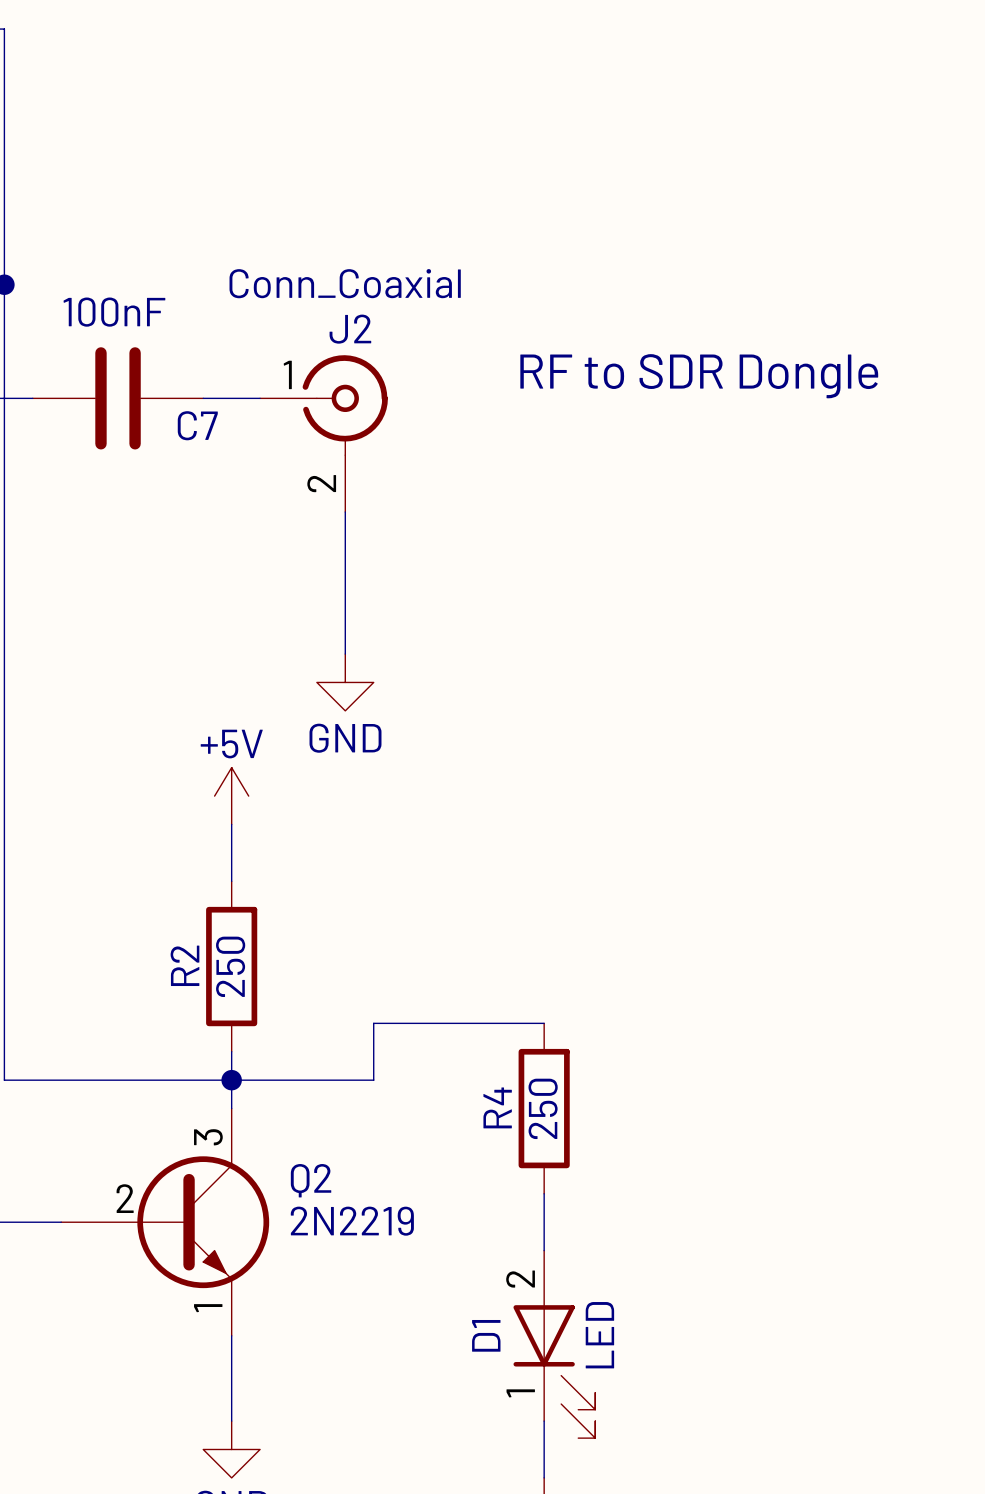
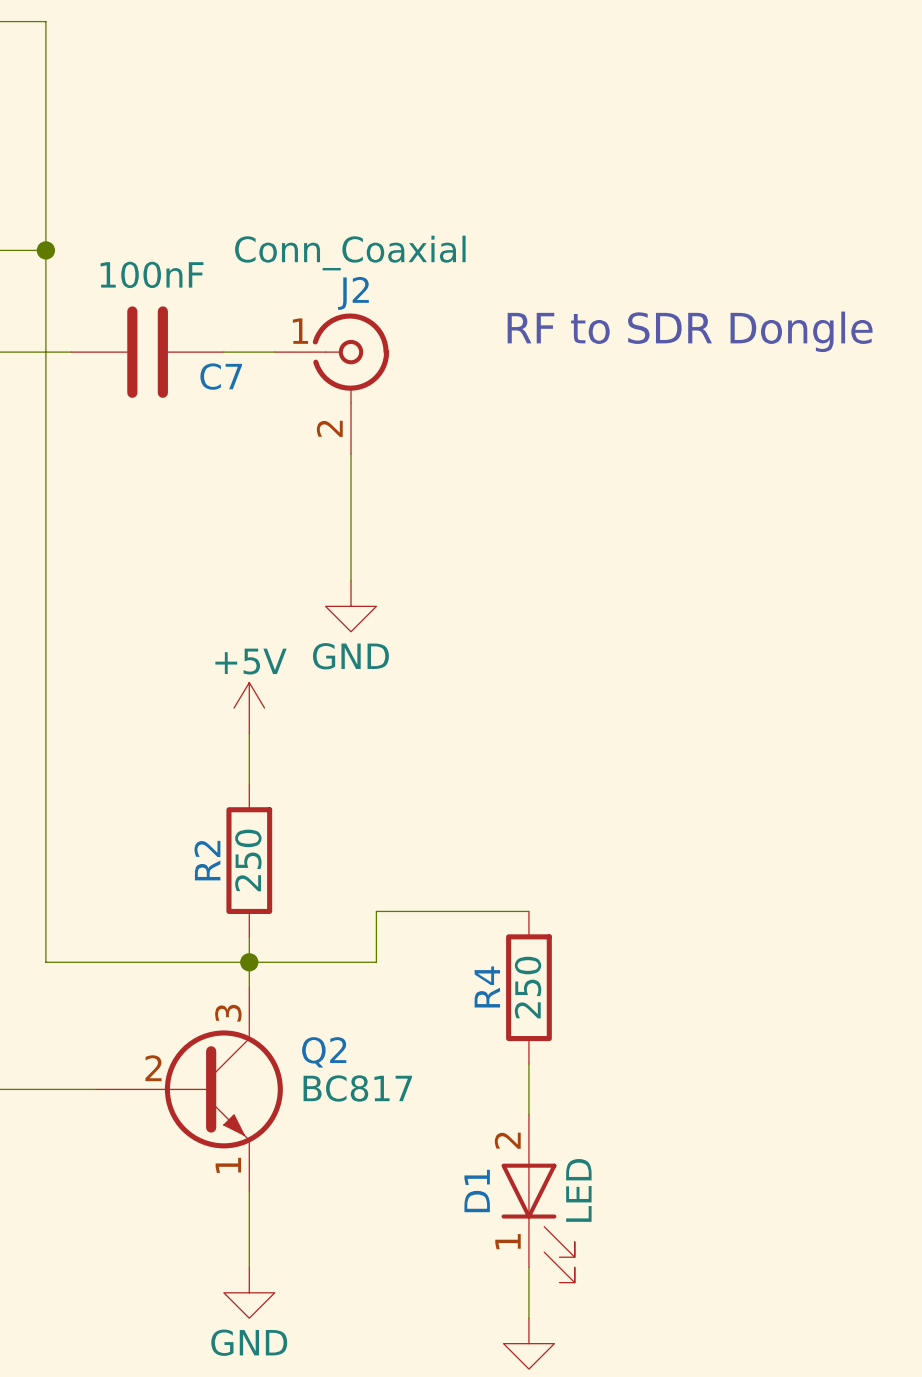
Q2 value: 2N2219 (352, 1221) -> BC817 (357, 1088)

